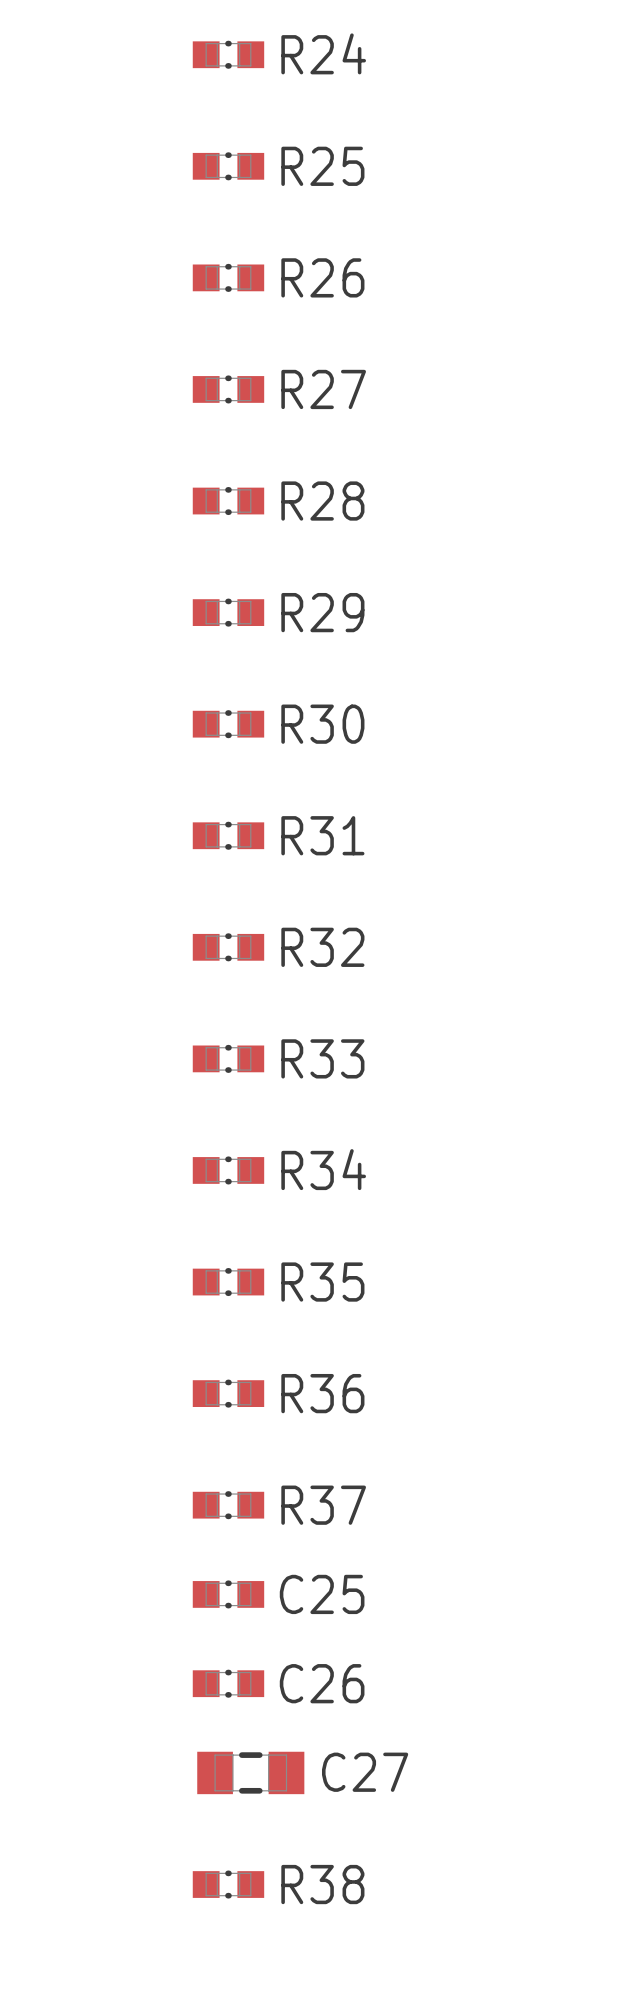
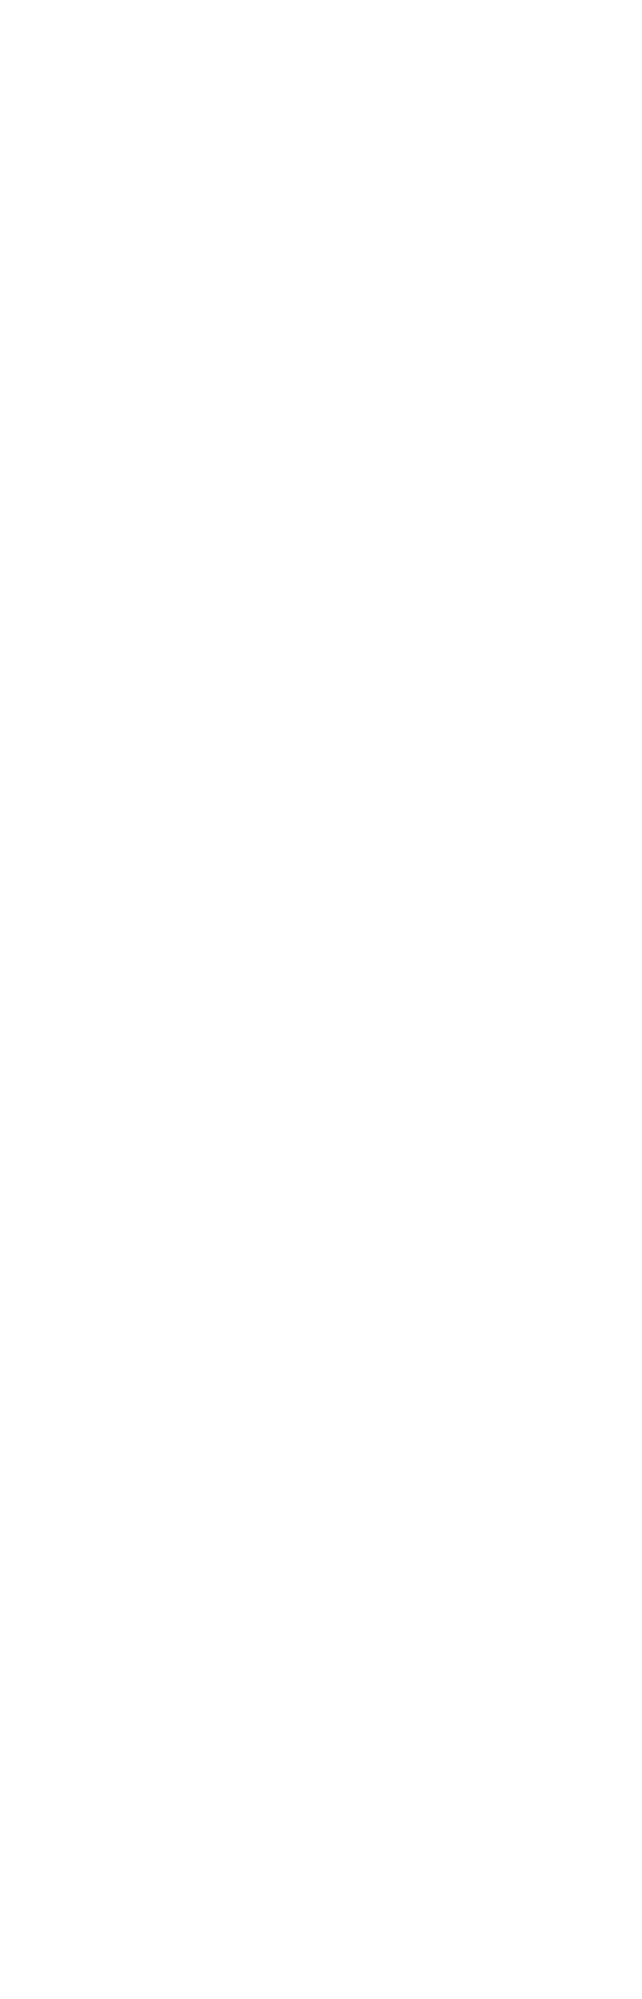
R24: (228, 54) -> none
R25: (228, 166) -> none
R26: (228, 277) -> none
R27: (228, 389) -> none
R28: (228, 501) -> none
R29: (228, 612) -> none
R30: (228, 724) -> none
R31: (228, 835) -> none
R32: (228, 947) -> none
R33: (228, 1058) -> none
R34: (228, 1170) -> none
R35: (228, 1282) -> none
R36: (228, 1393) -> none
R37: (228, 1505) -> none
C25: (228, 1594) -> none
C26: (228, 1683) -> none
C27: (250, 1772) -> none
R38: (228, 1884) -> none

